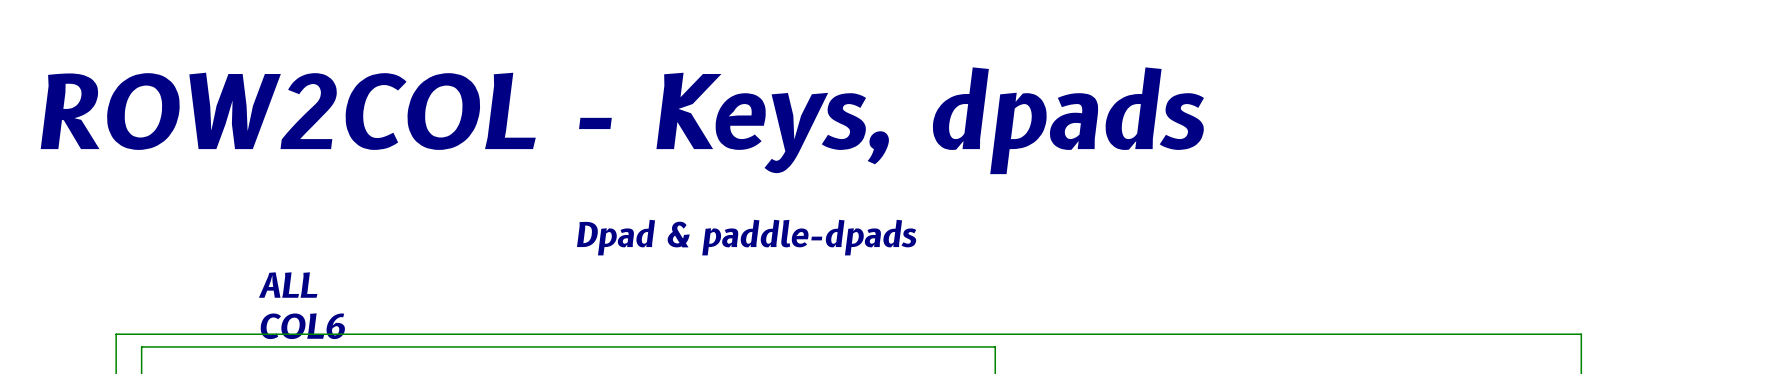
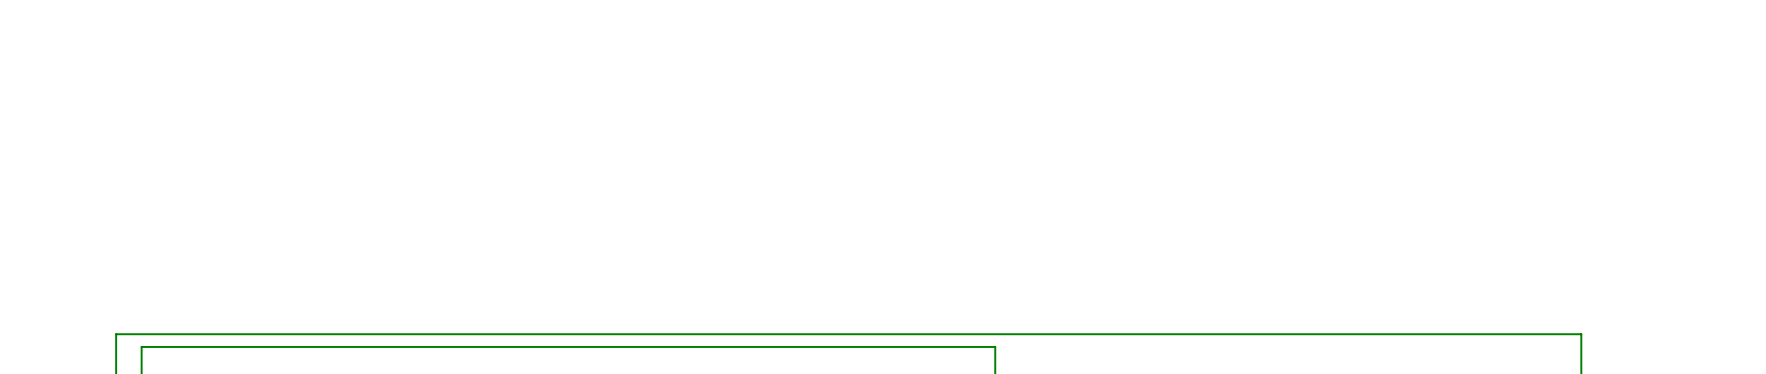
text: ROW2COL - Keys, dpads (622, 120) -> none
text: Dpad & paddle-dpads (746, 237) -> none
text: ALL (288, 285) -> none
text: COL6 (302, 326) -> none

